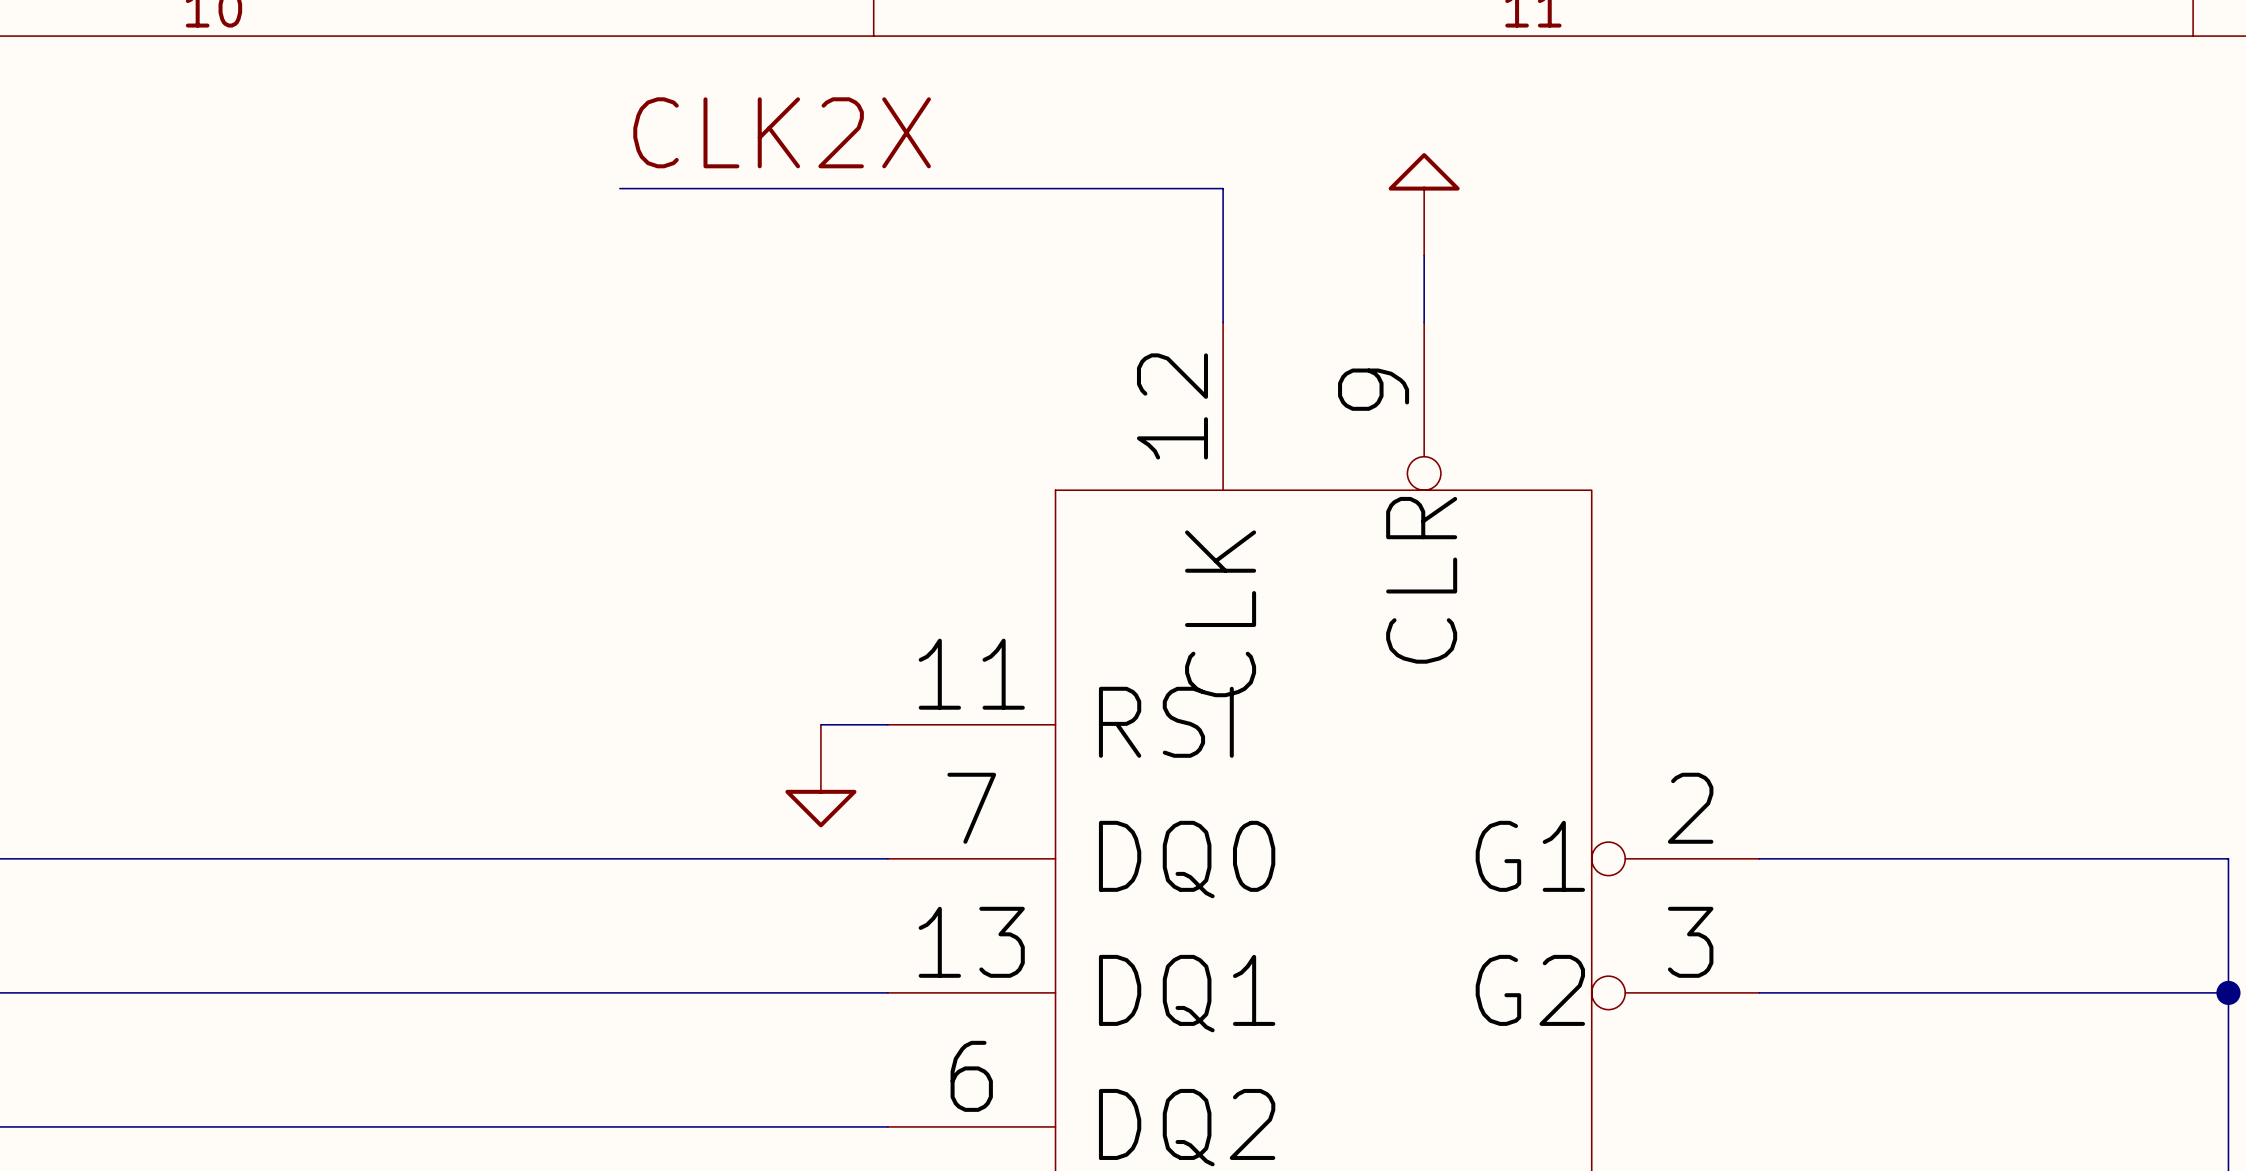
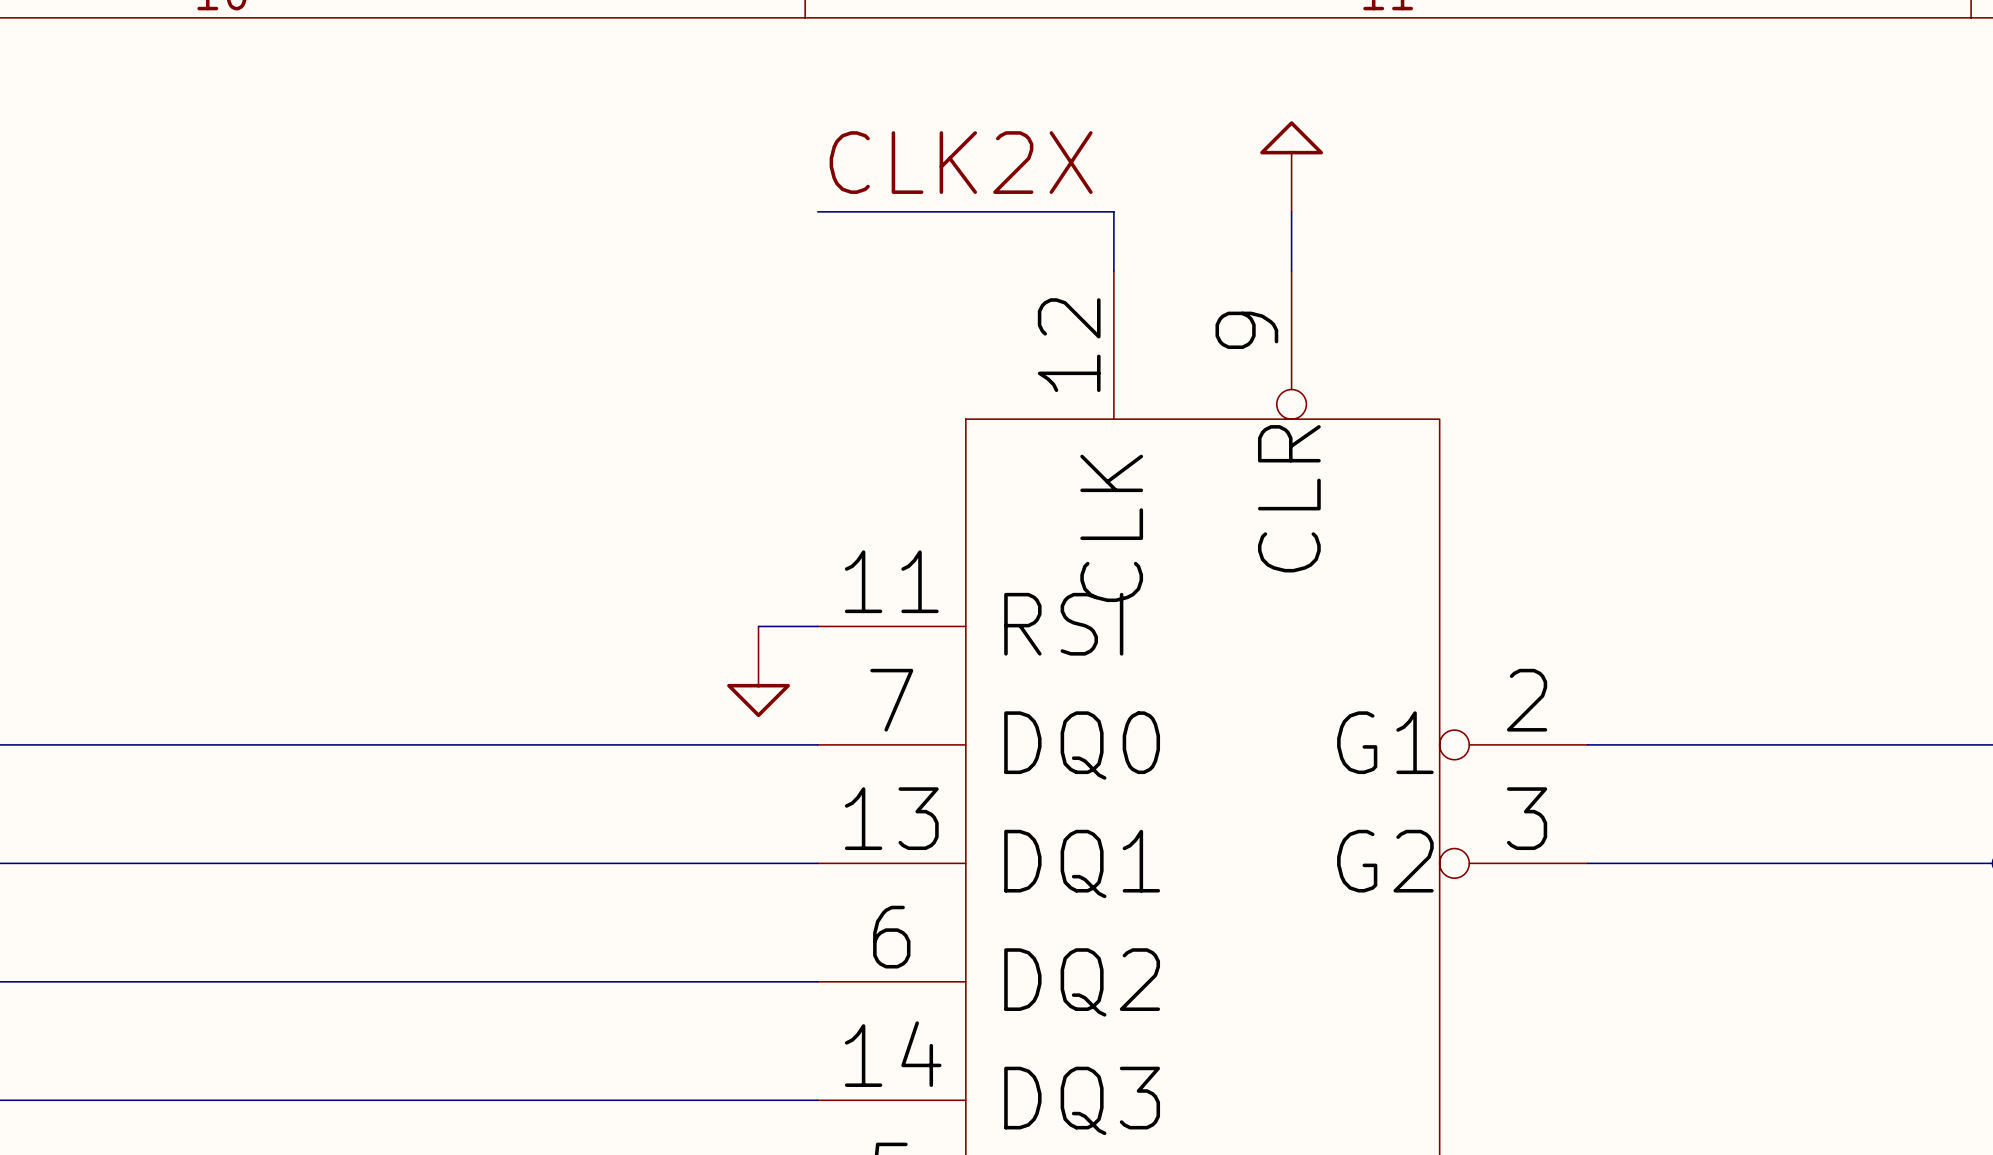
label position: CLK2X (782, 132) -> CLK2X (961, 162)
wire: (619, 188) (1223, 188) (1223, 255) -> (817, 211) (1113, 211)

